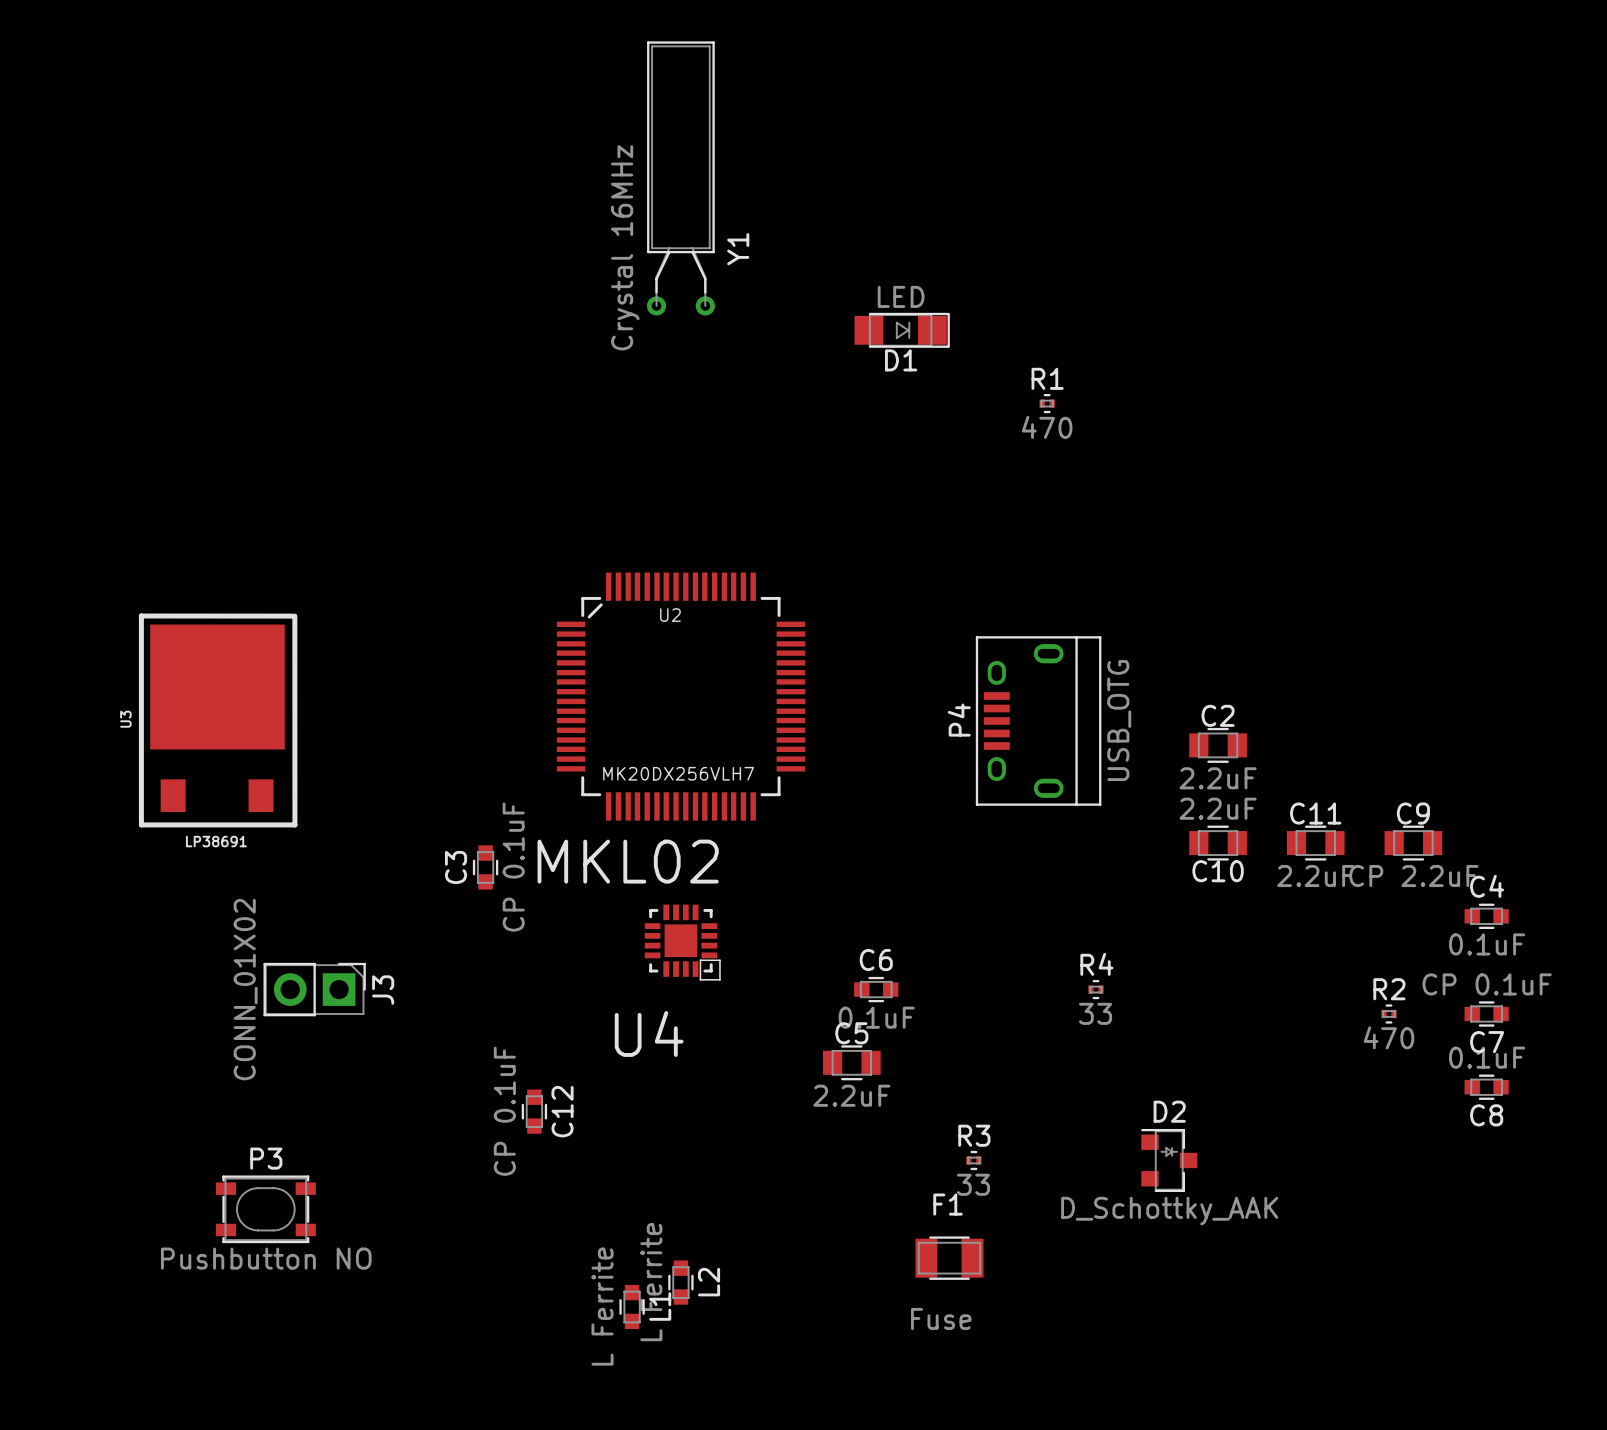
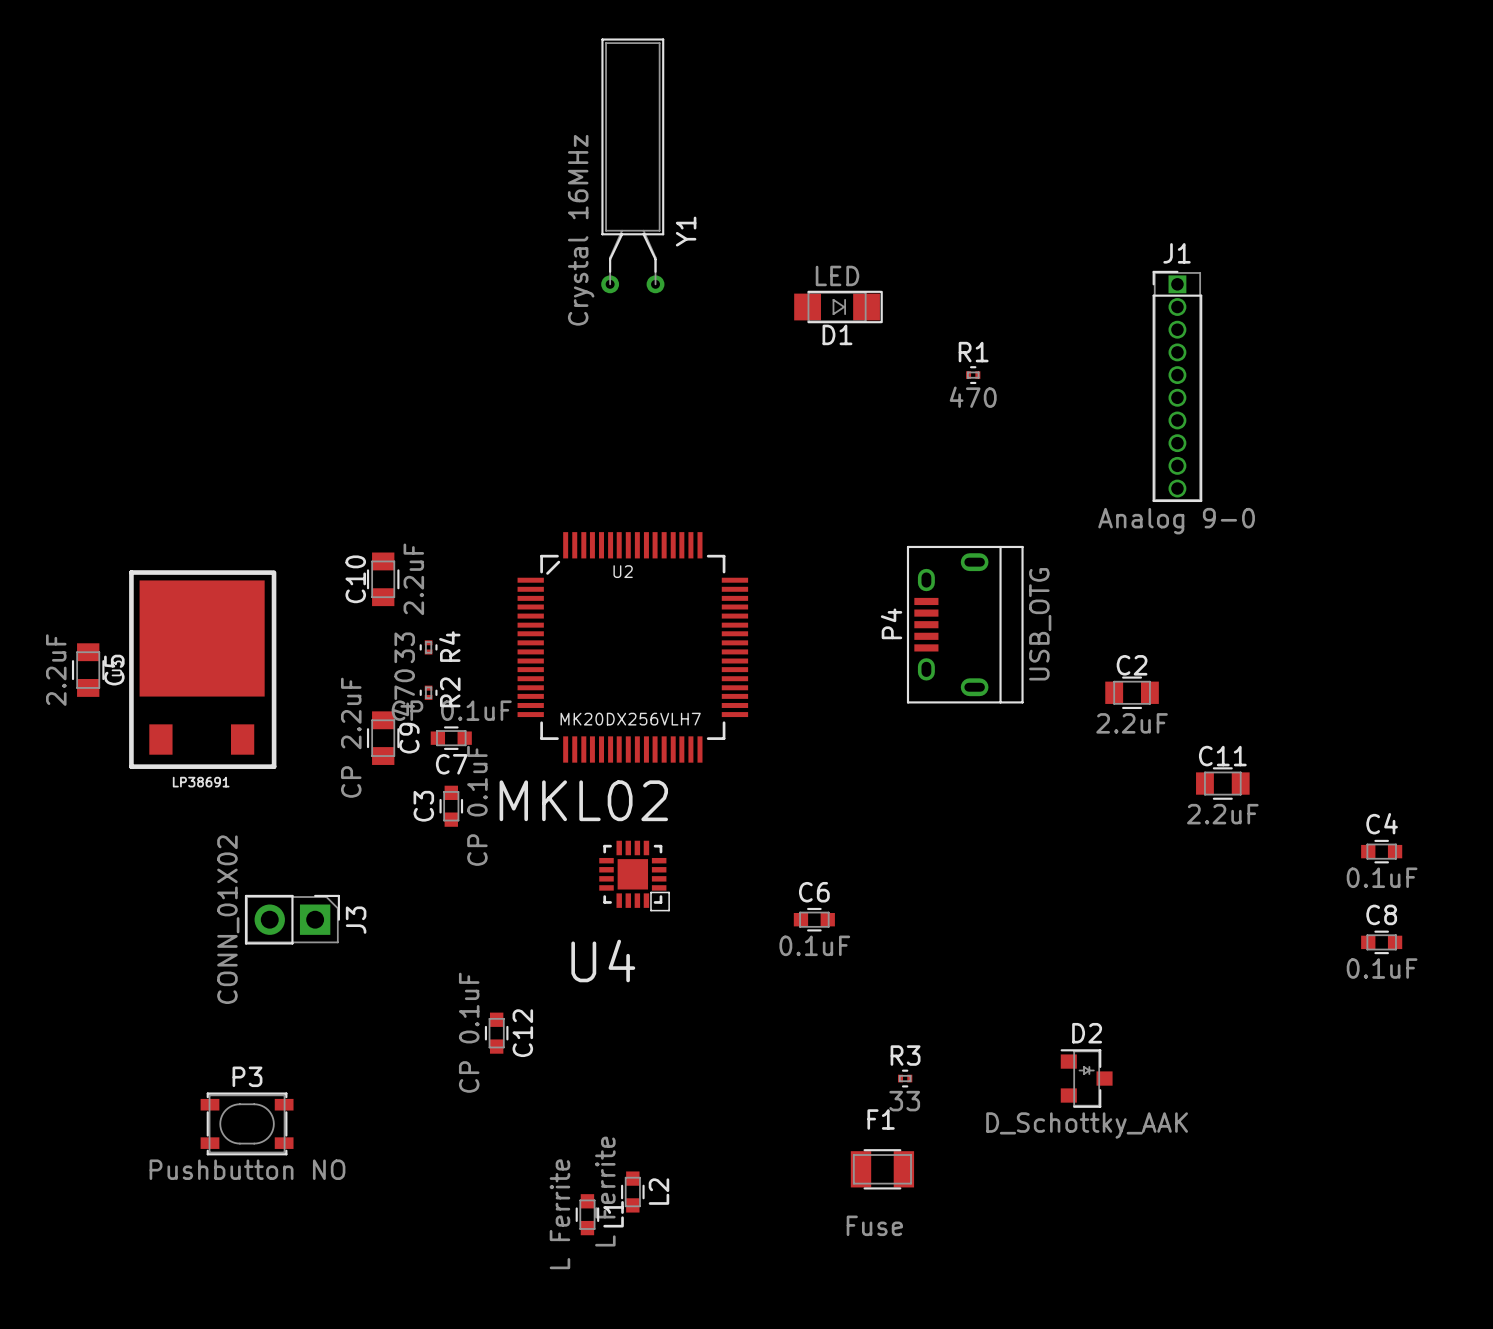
J1: none -> Analog 9-0 (1177, 386)
P4 position: (1038, 720) -> (965, 624)
C7: none -> CP 0.1uF (451, 738)
C10 rotation: 0° (1218, 843) -> 90° clockwise (383, 579)
C10 position: (1218, 843) -> (383, 579)
C9 rotation: 0° (1413, 843) -> 90° clockwise (383, 738)
C9 position: (1413, 843) -> (383, 738)
C7 value: CP 0.1uF (1487, 984) -> 0.1uF (1382, 968)
R4 rotation: 0° (1095, 989) -> 90° clockwise (428, 647)
R4 position: (1095, 989) -> (428, 647)
R2 rotation: 0° (1388, 1013) -> 90° clockwise (428, 692)
R2 position: (1388, 1013) -> (428, 692)
C7 name: C7 (1487, 1042) -> C8 (1381, 914)
C5 rotation: 0° (851, 1062) -> 90° clockwise (88, 670)
C5 position: (851, 1062) -> (88, 670)
C8: 0.1uF (1486, 1087) -> none

